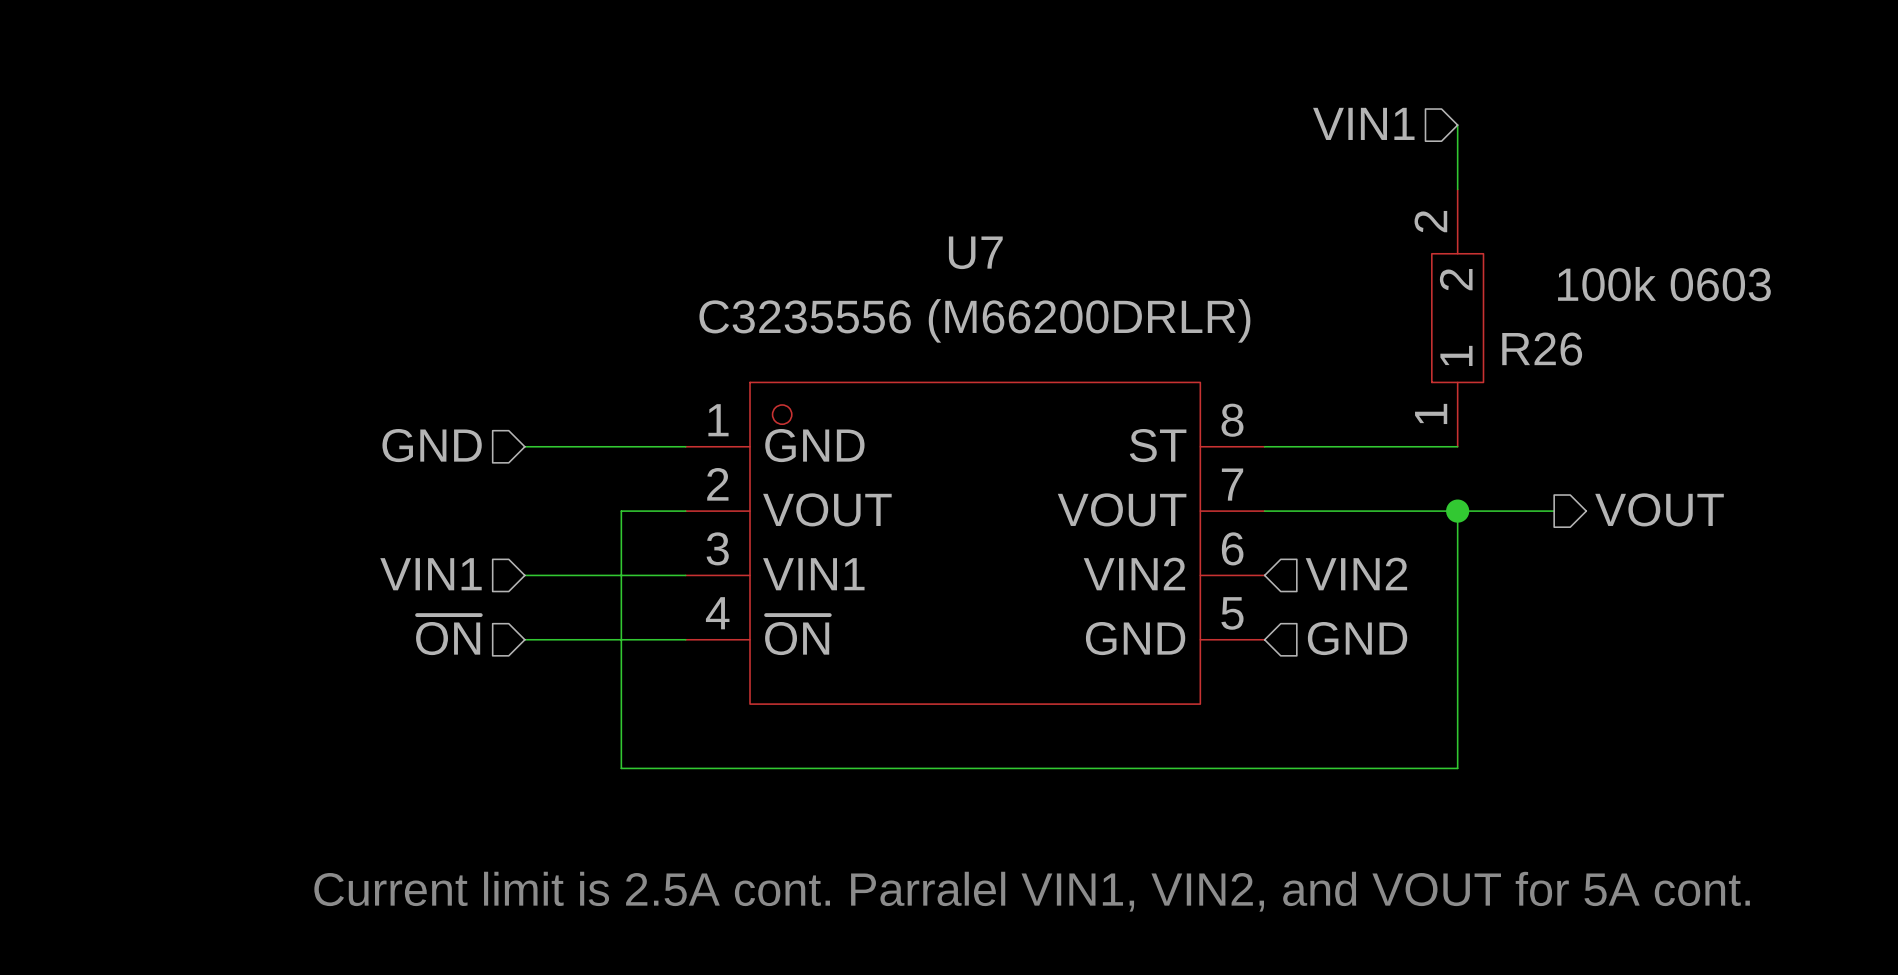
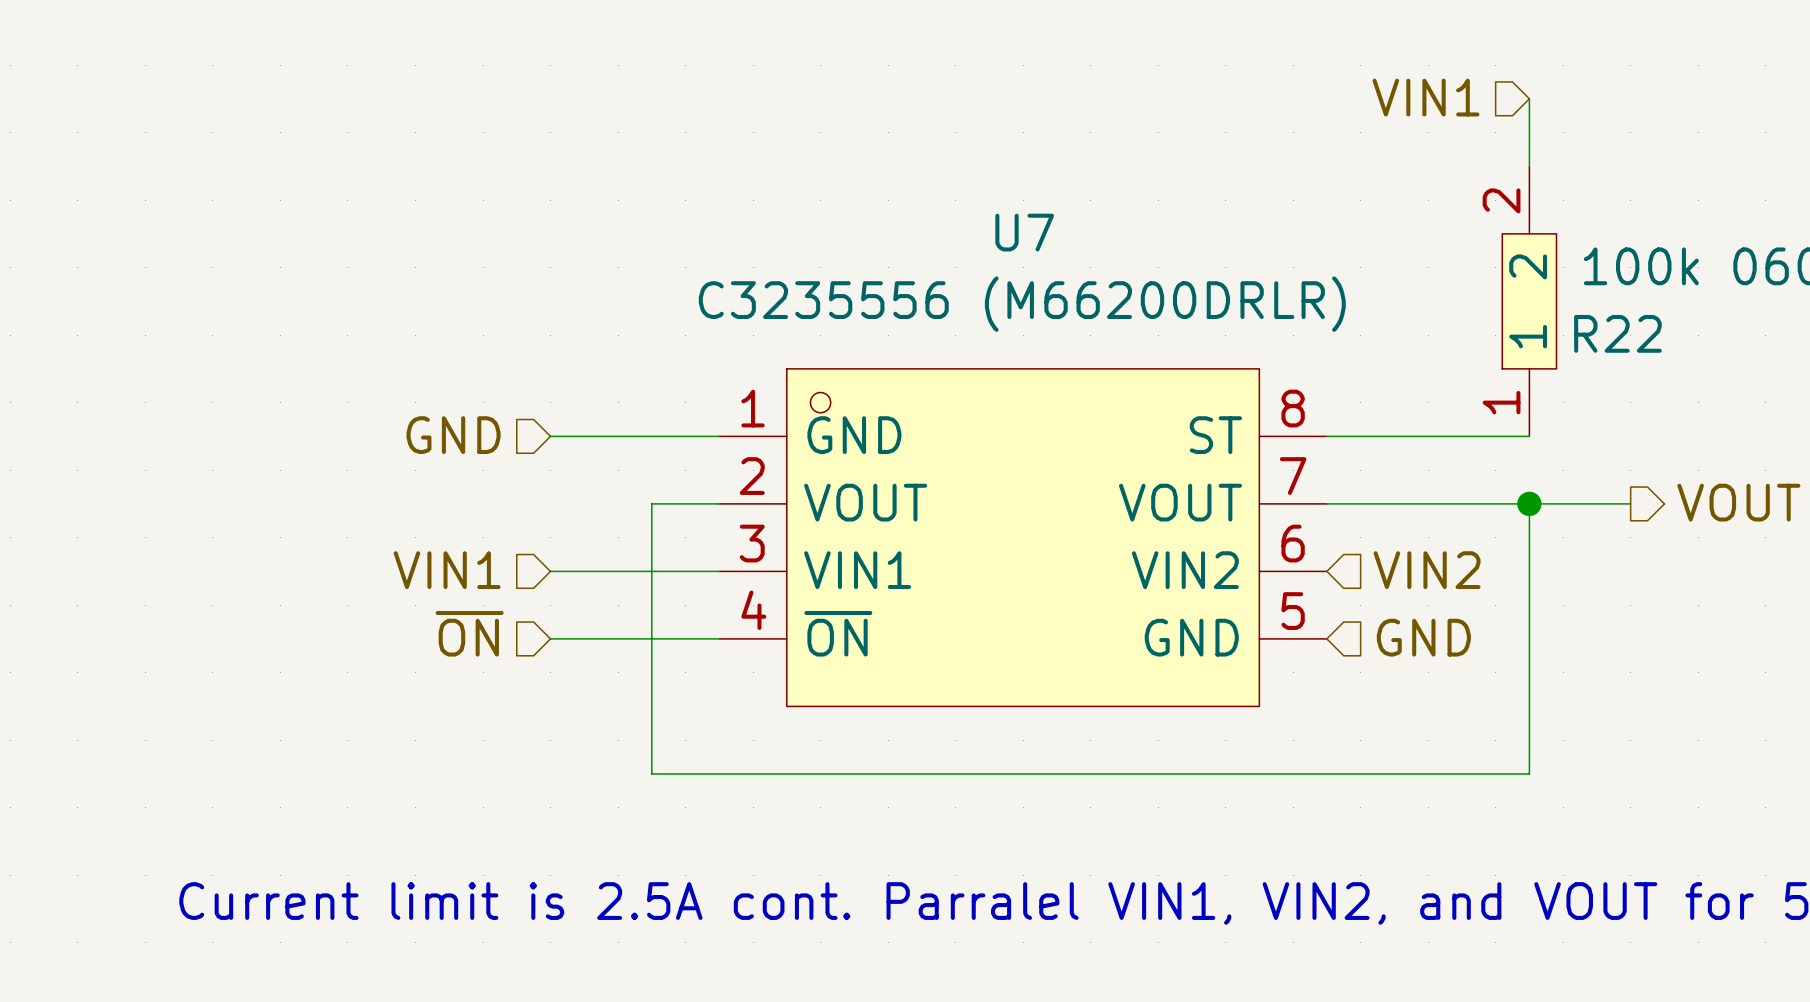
R26 name: R26 (1542, 349) -> R22 (1617, 333)

